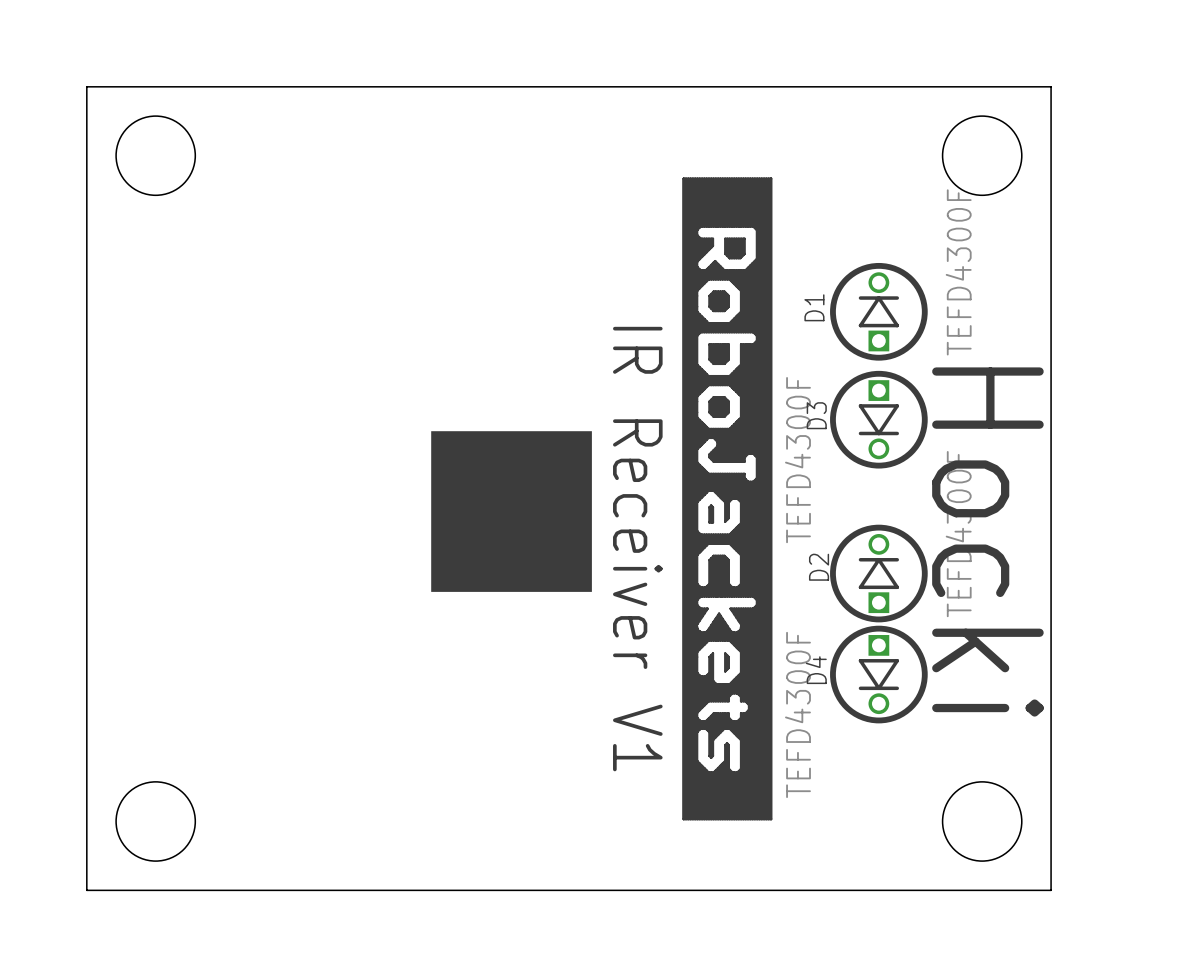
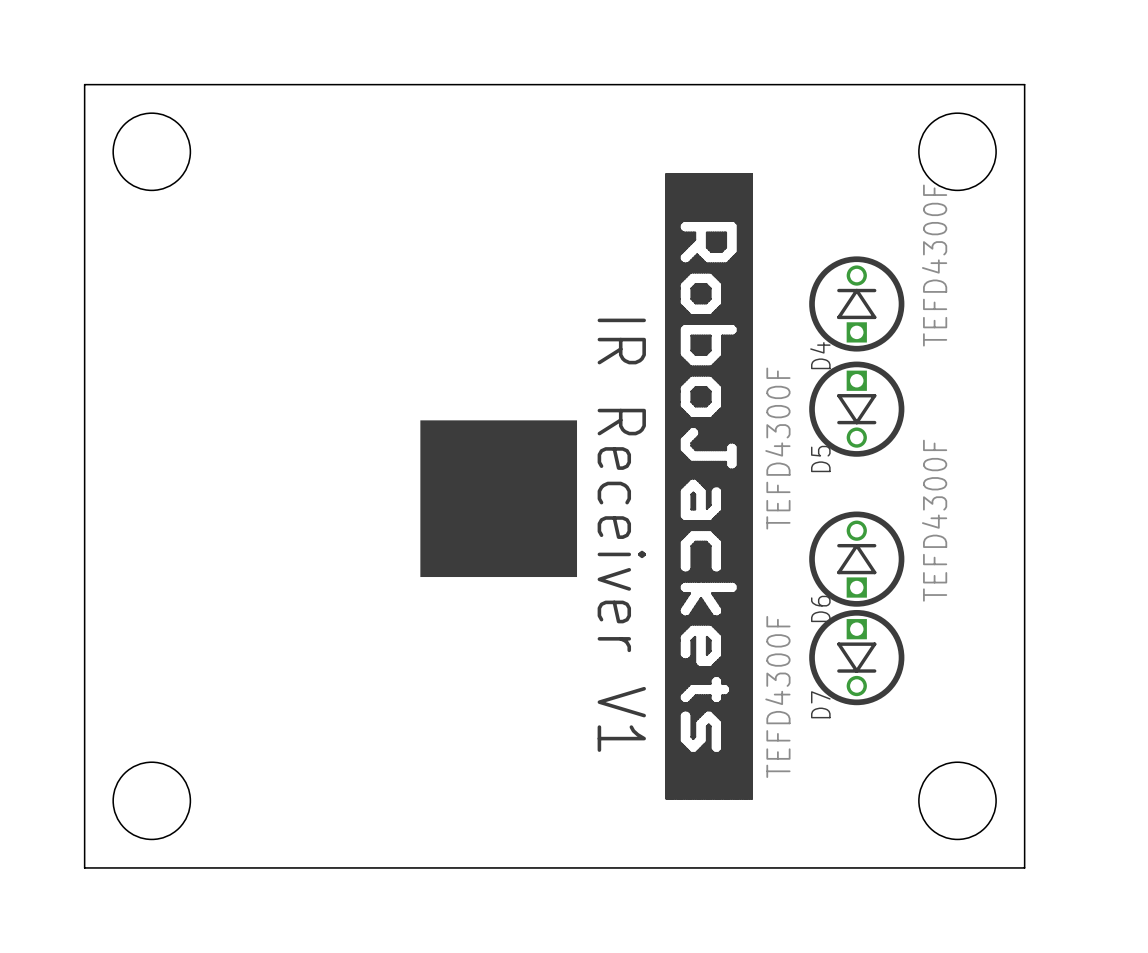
D1 name: D1 (814, 307) -> D4 (820, 355)
D3 name: D3 (816, 415) -> D5 (820, 458)
text: Hocki (987, 541) -> none
D2 name: D2 (819, 567) -> D6 (820, 608)
D4 name: D4 (816, 670) -> D7 (820, 704)

